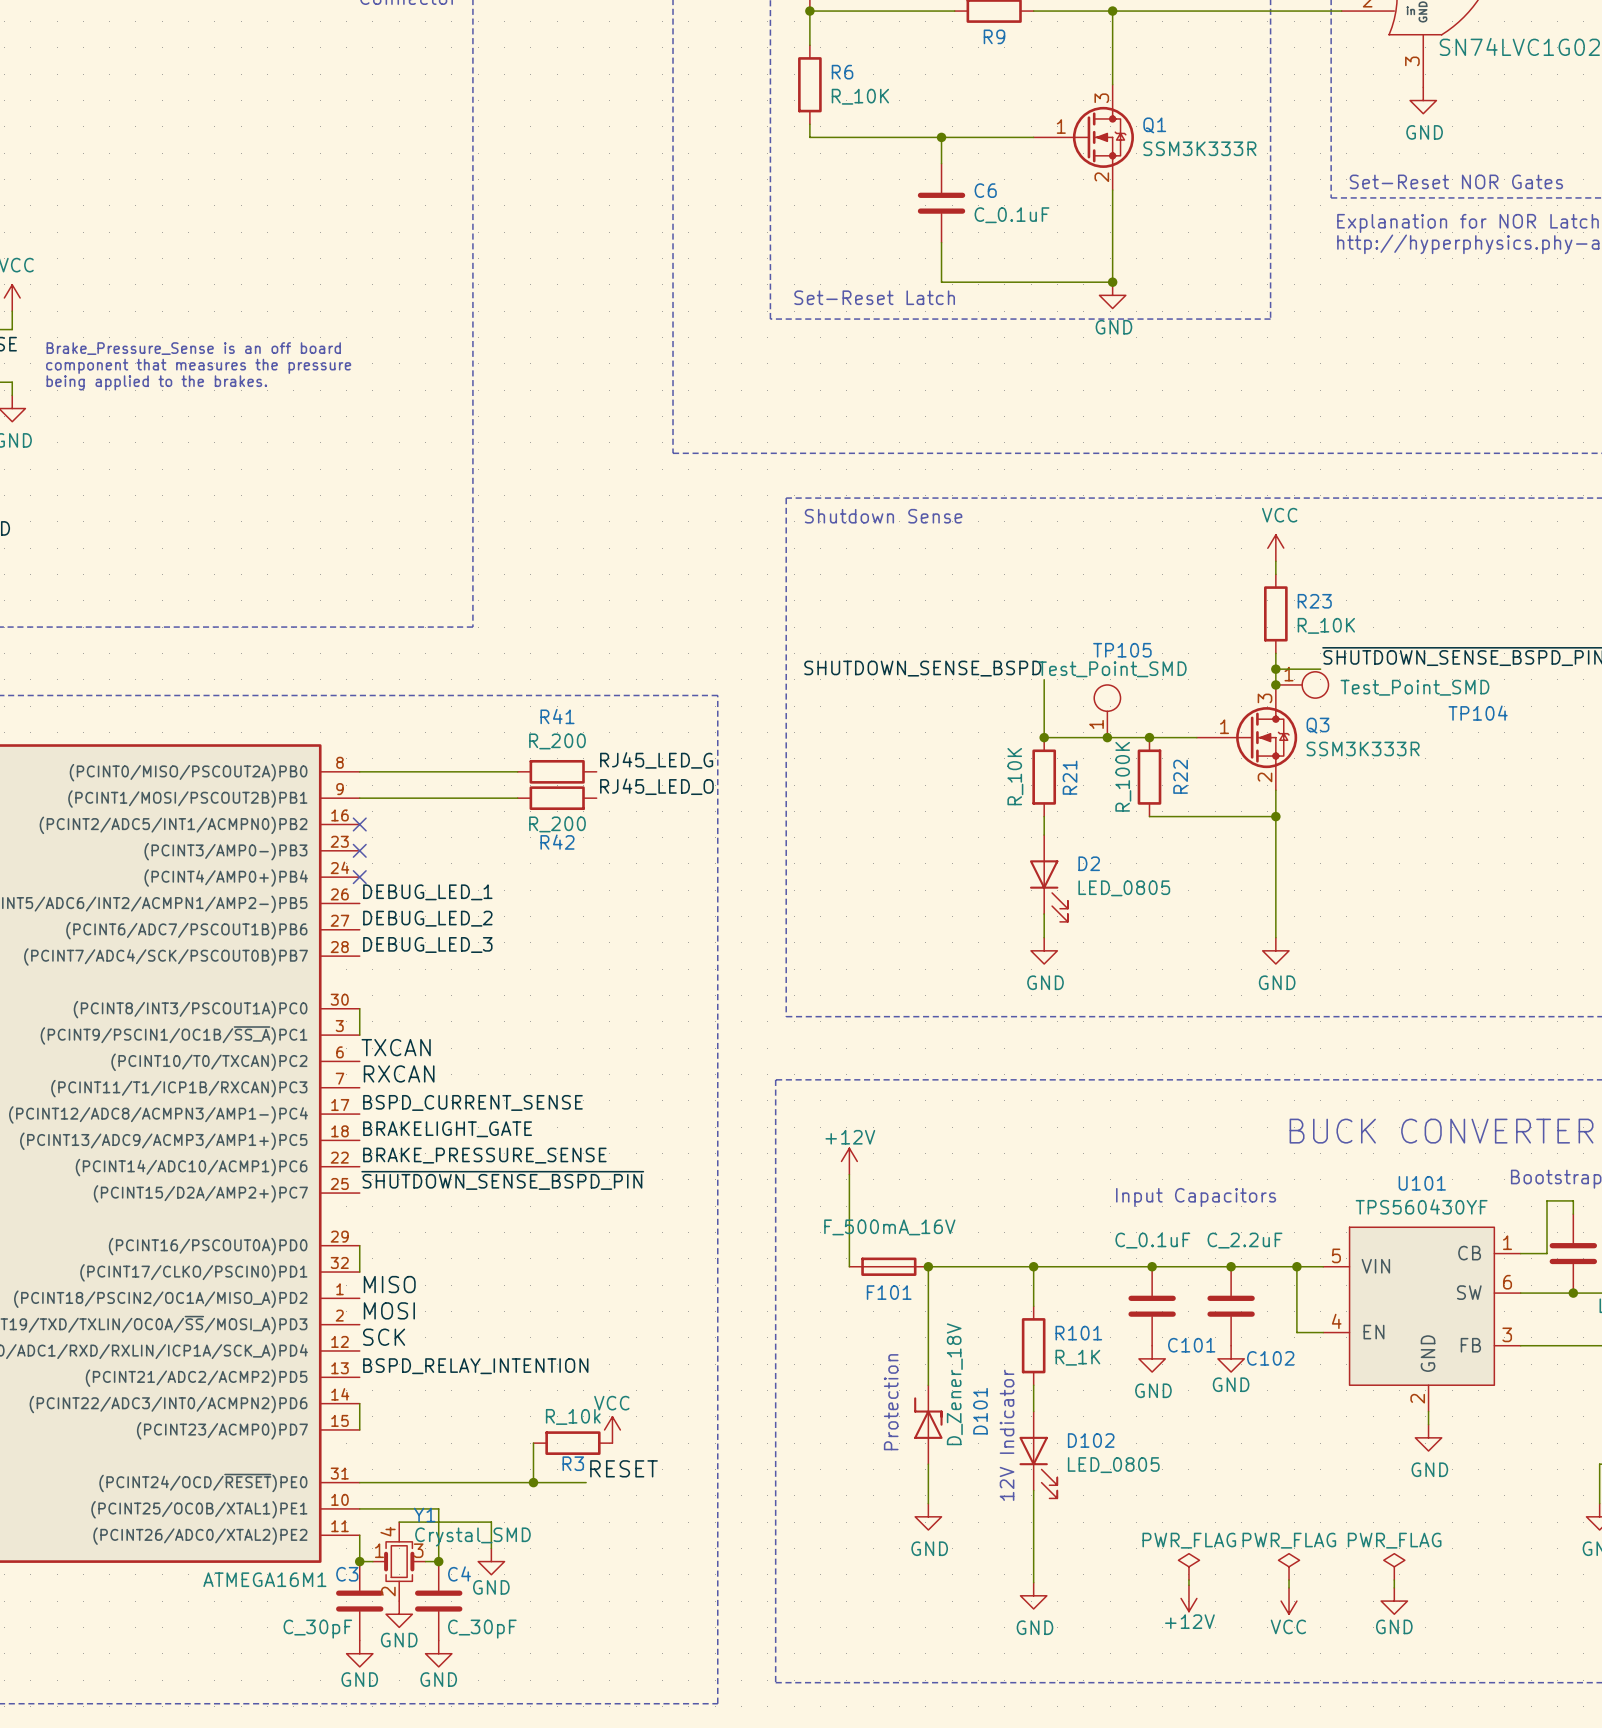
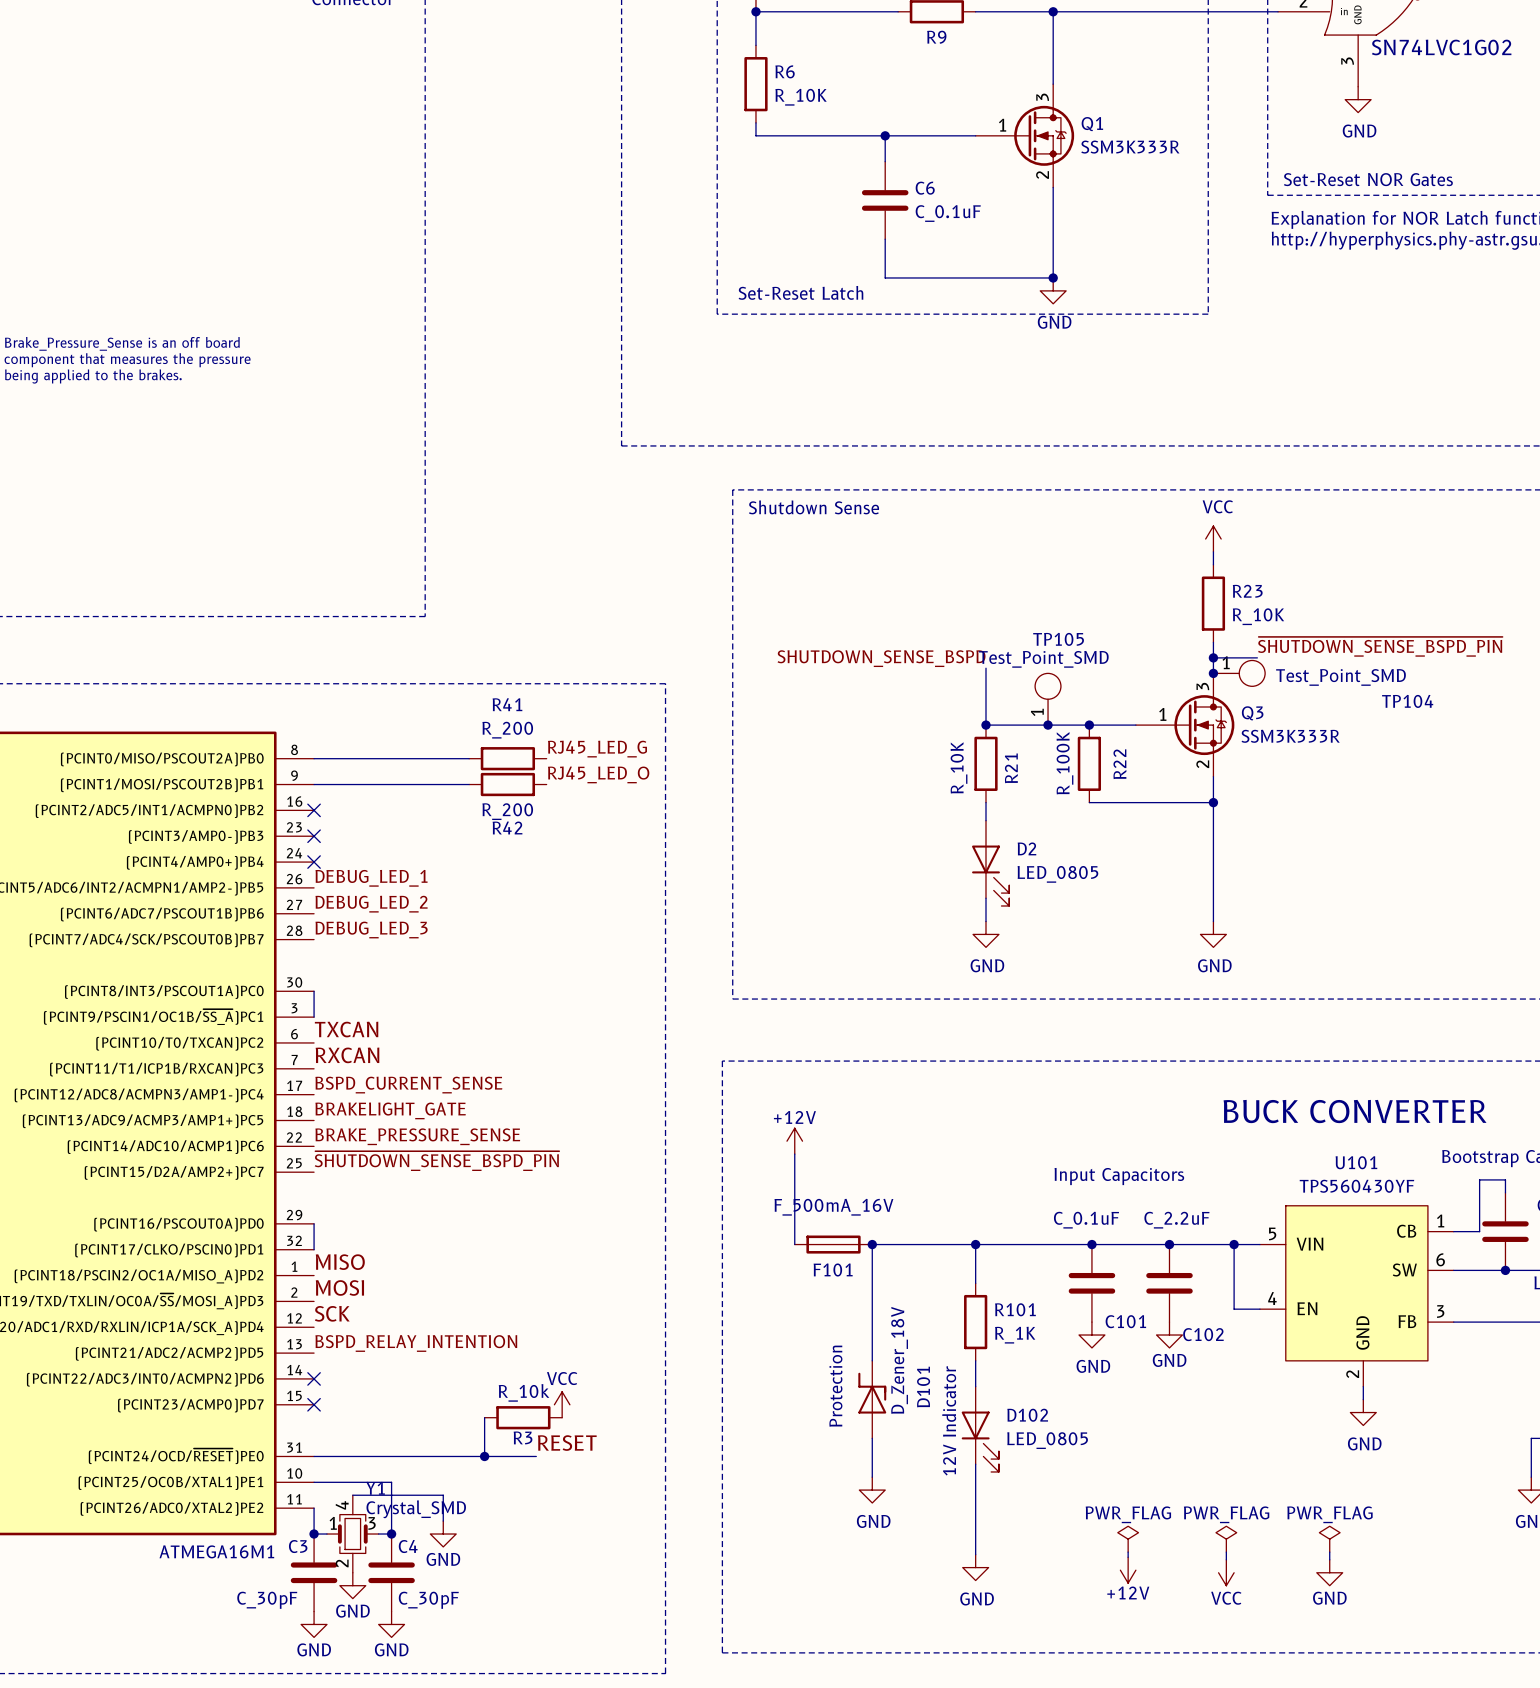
wire: (359, 1403) (359, 1429) -> none
no-connect mark: none -> (314, 1378)
no-connect mark: none -> (314, 1404)

